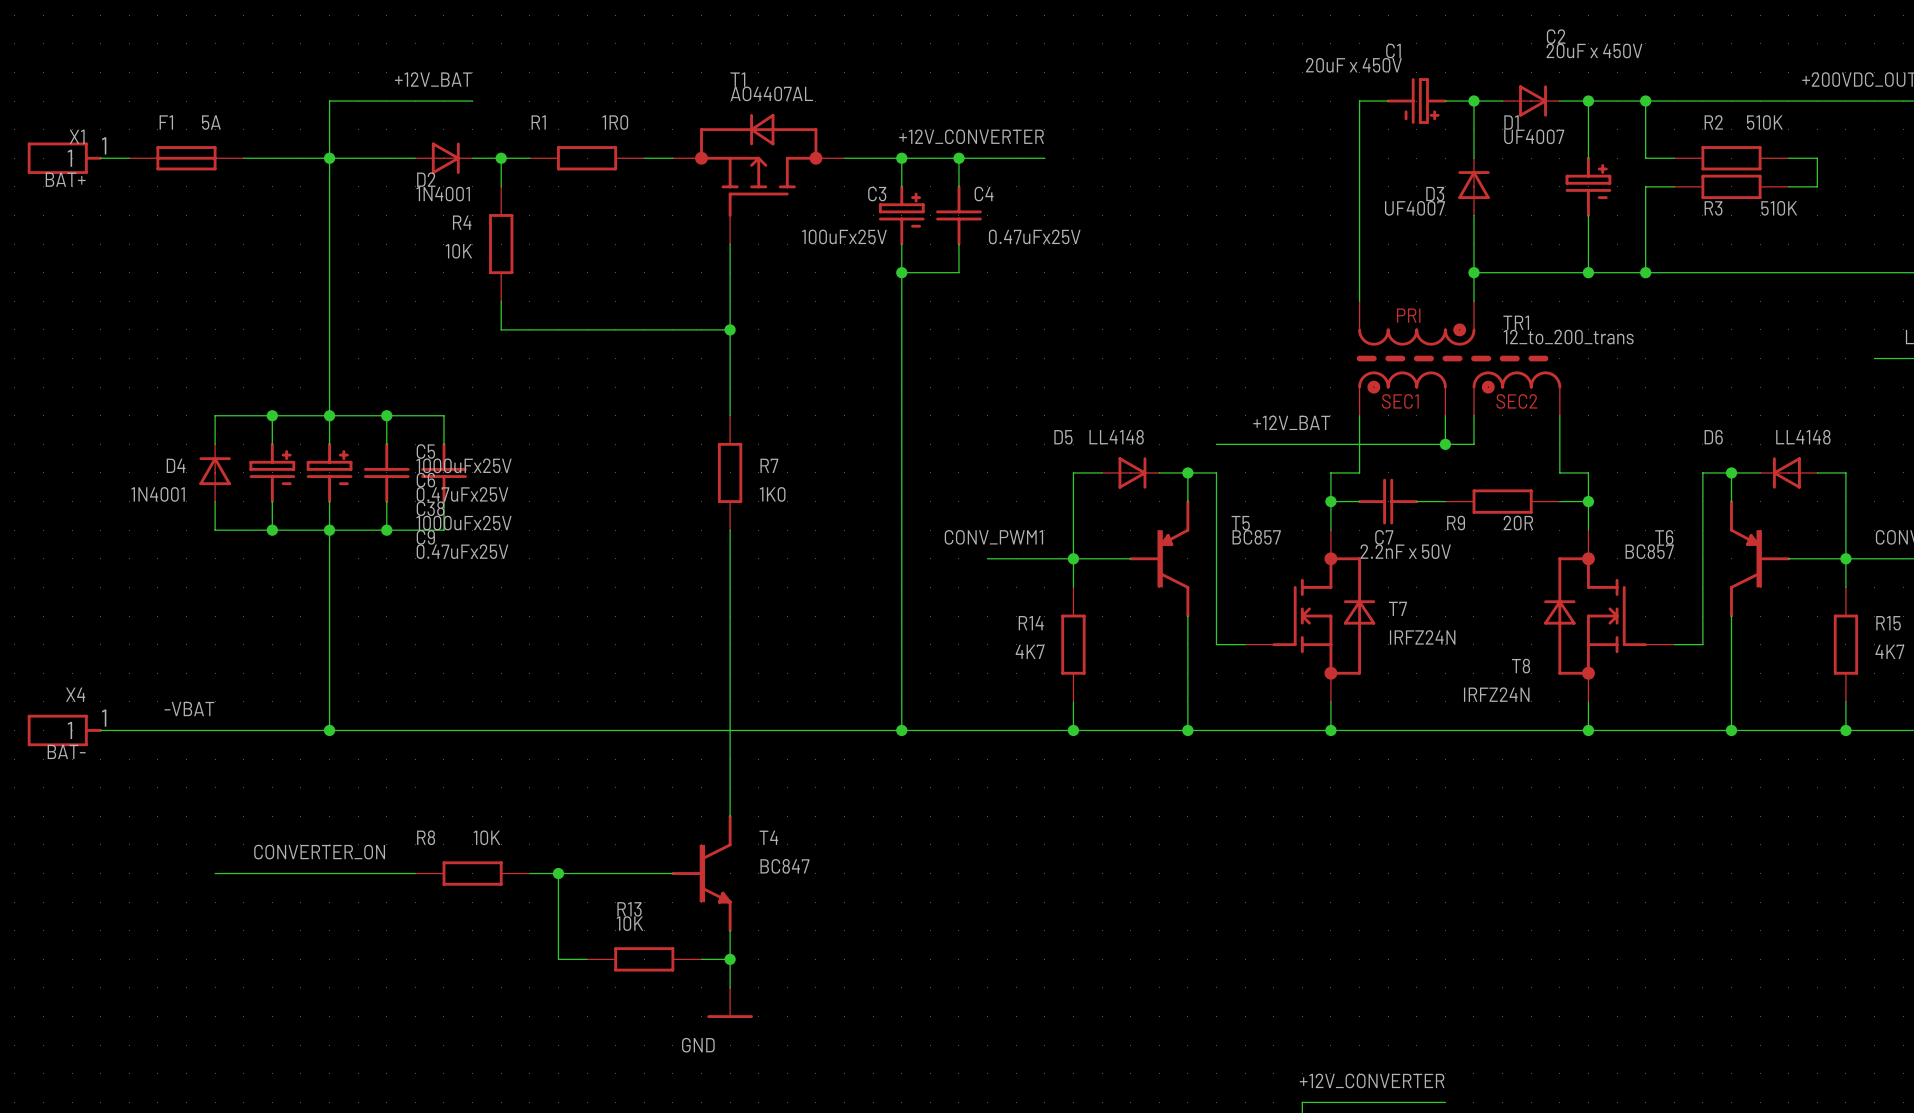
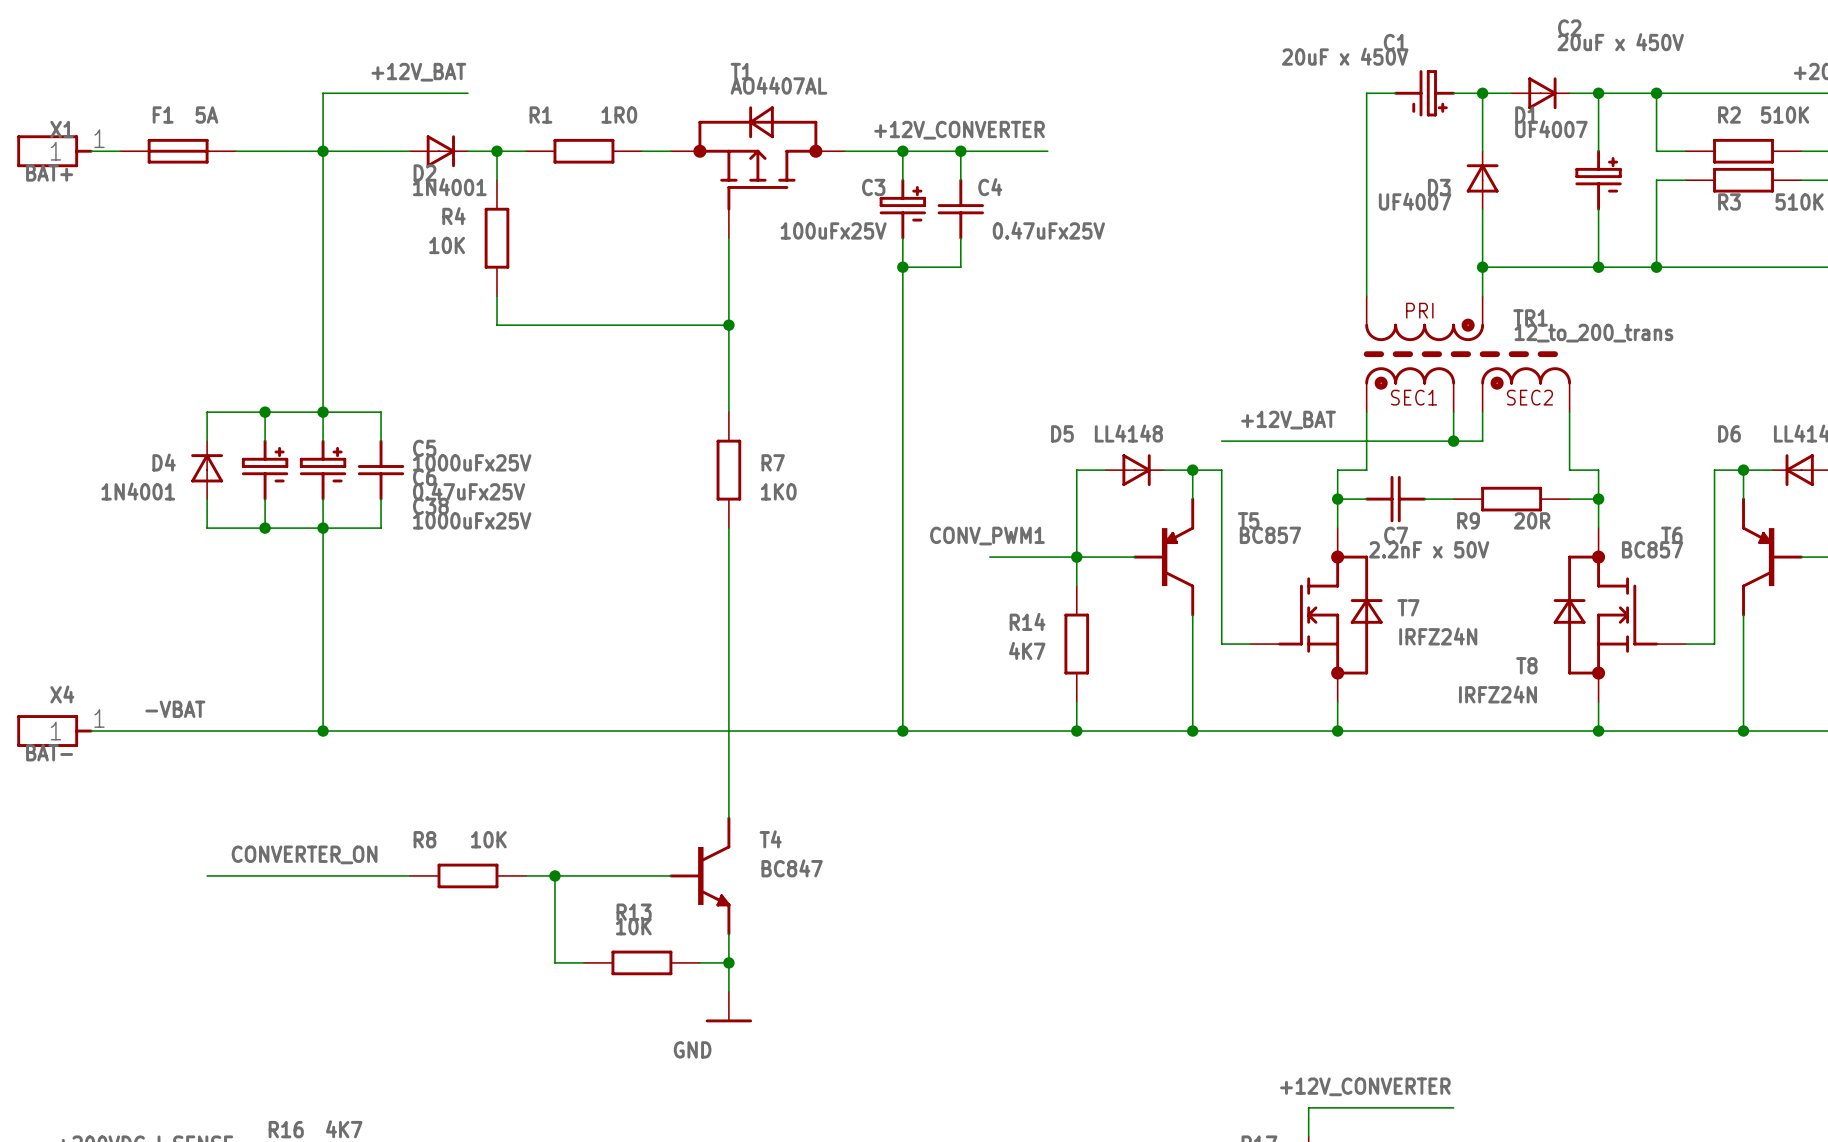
wire: (386, 415) (443, 415) (443, 444) -> none
junction: (386, 415) -> none
C9: 0.47uFx25V (443, 472) -> none
wire: (443, 501) (443, 530) (386, 530) -> none
junction: (386, 530) -> none

